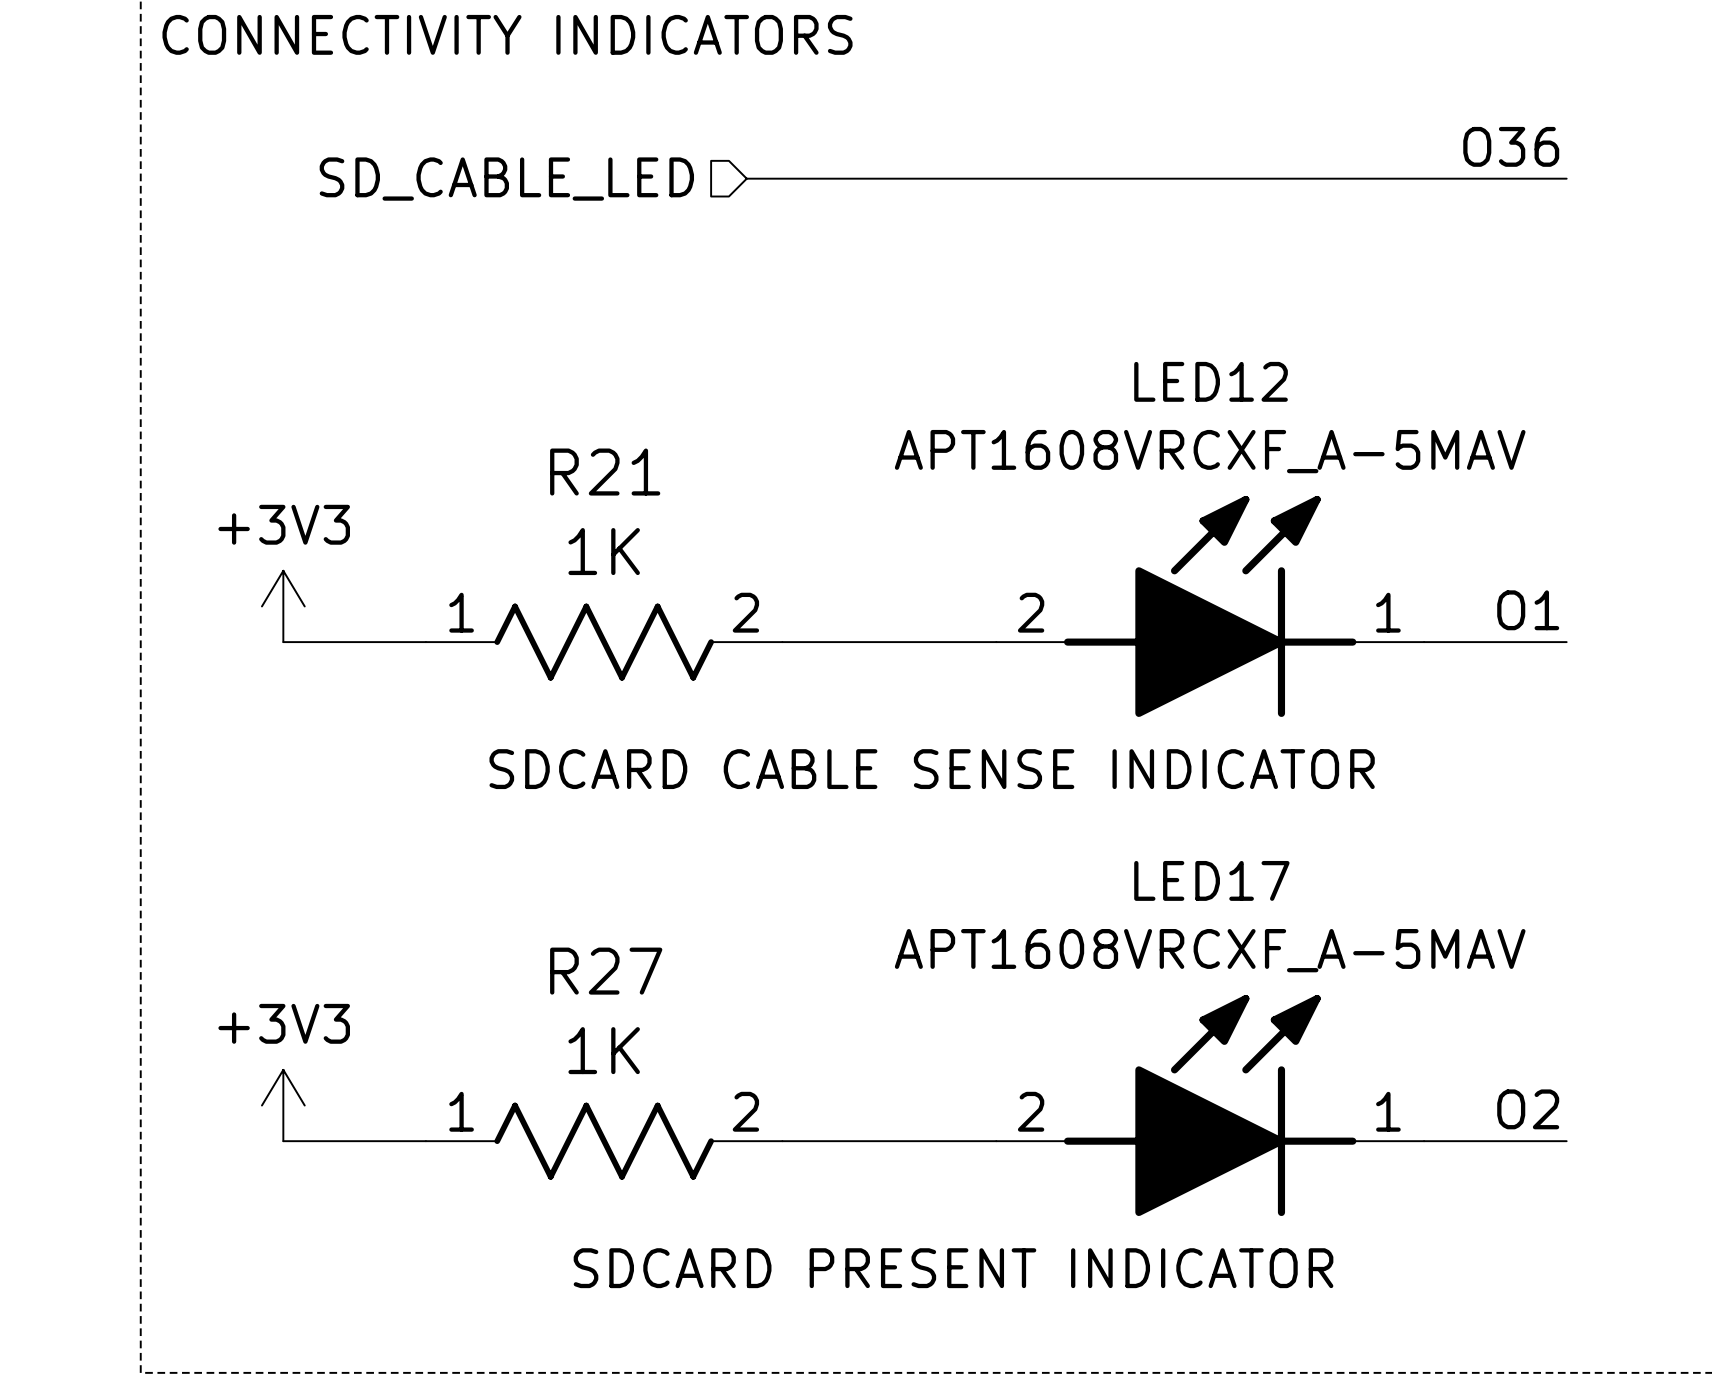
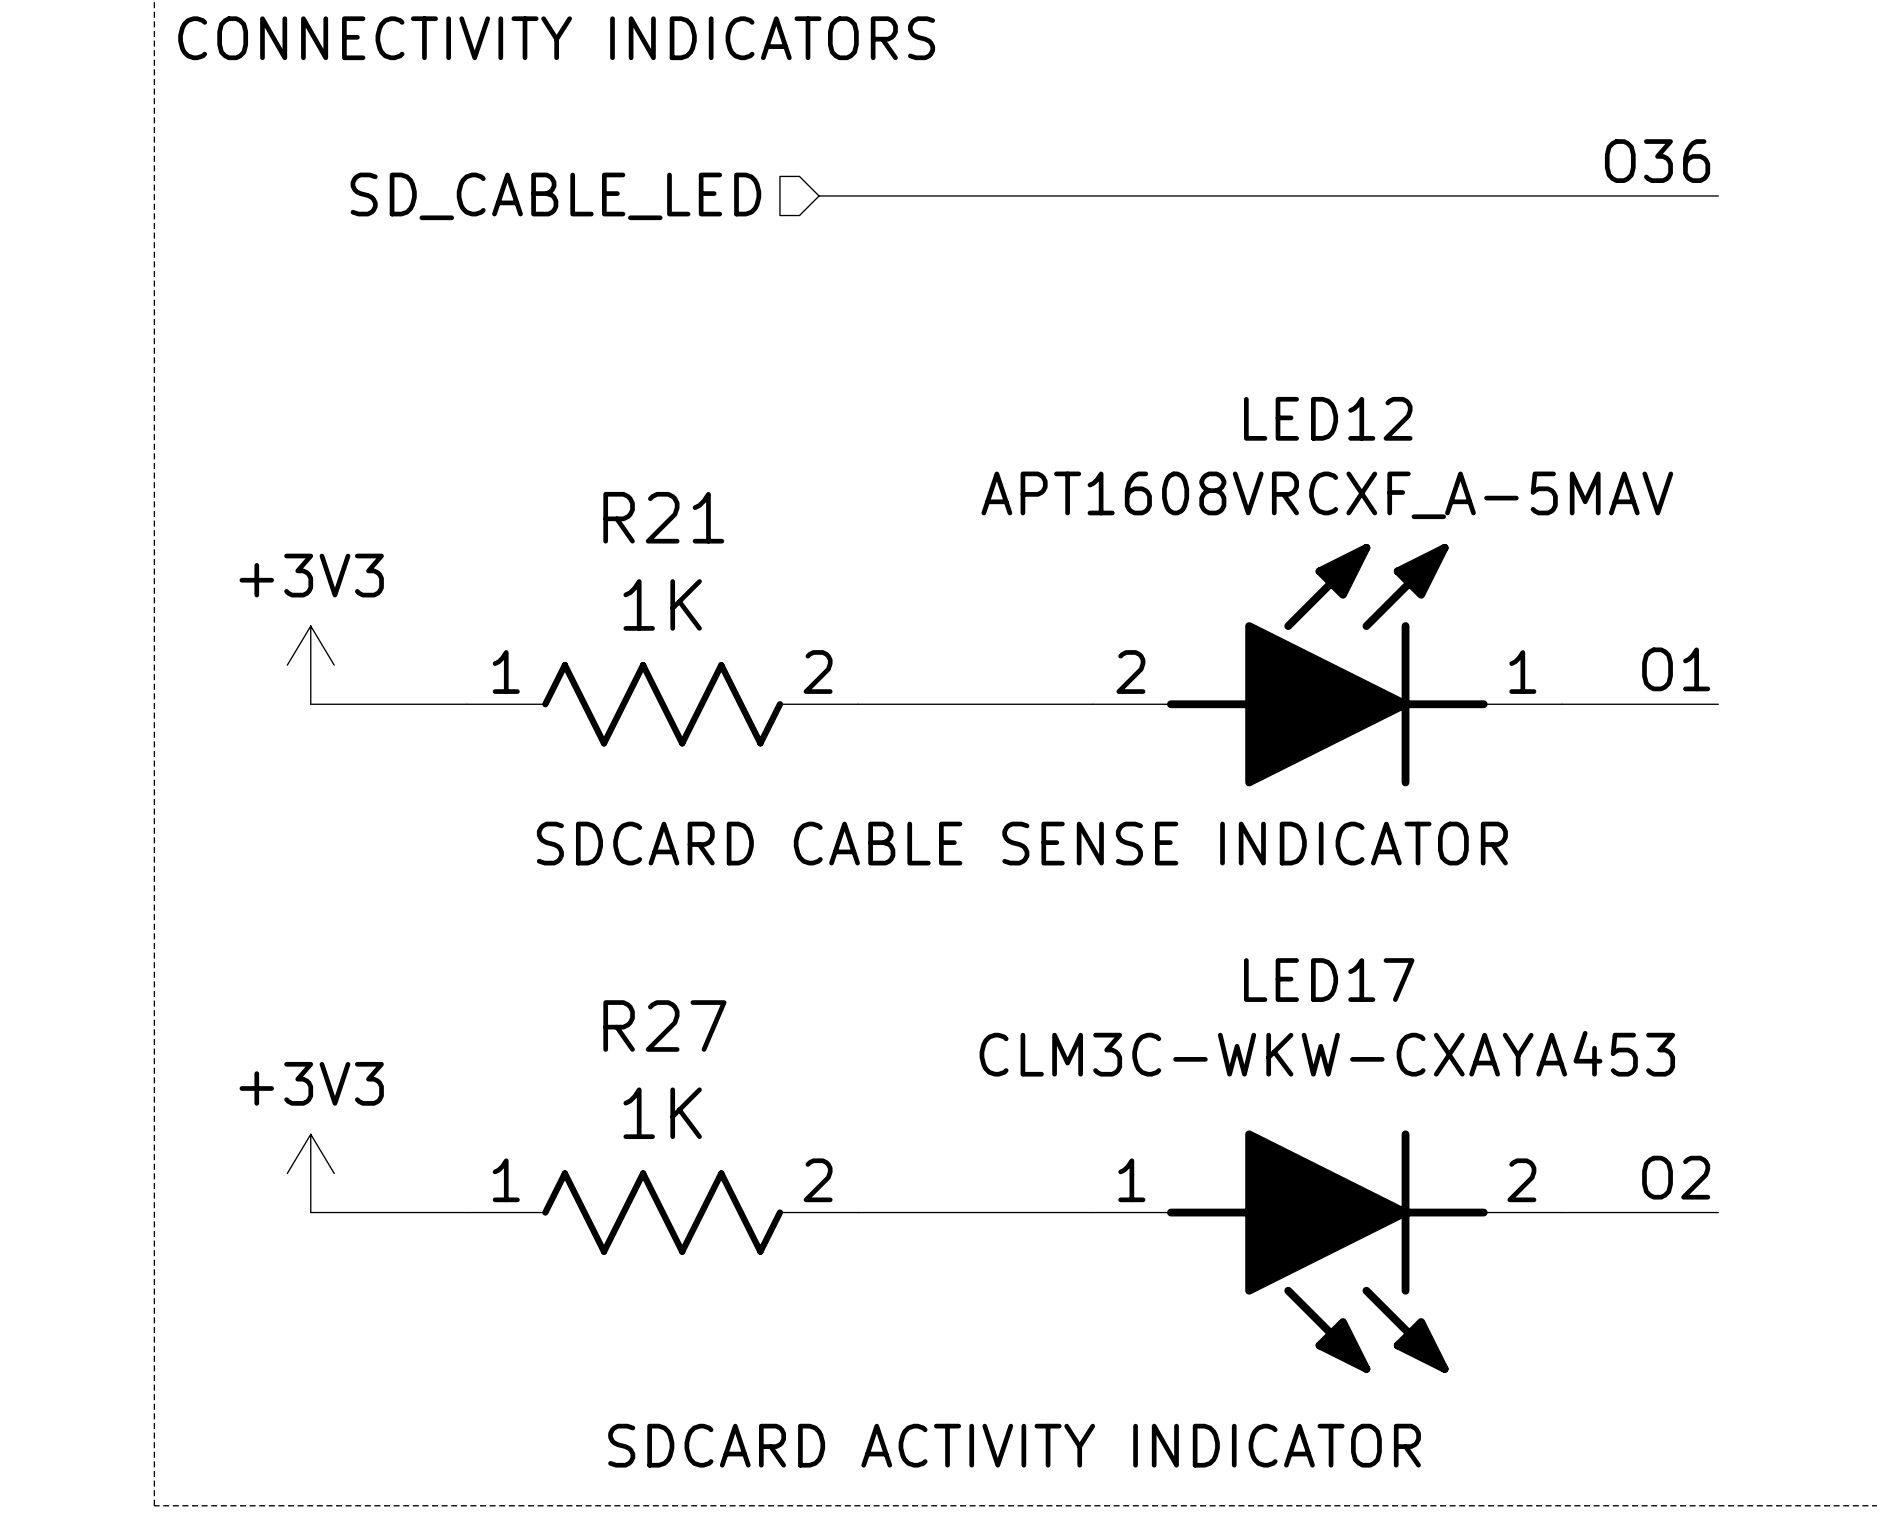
LED17 value: APT1608VRCXF_A-5MAV (1210, 950) -> CLM3C-WKW-CXAYA453 (1327, 1053)
LED17 symbol: [996, 995, 1425, 1217] -> [1092, 1130, 1562, 1373]
power symbol position: +3V3 (283, 1105) -> +3V3 (310, 1173)
label position: O2 (1528, 1109) -> O2 (1676, 1177)
wire: (283, 1141) (425, 1141) -> (310, 1212) (467, 1212)
R27 position: (604, 1141) -> (662, 1212)
wire: (782, 1141) (996, 1141) -> (858, 1212) (1092, 1212)
wire: (1424, 1141) (1566, 1141) -> (1561, 1212) (1718, 1212)
LED17 text: SDCARD PRESENT INDICATOR (953, 1268) -> none
LED17 text: none -> SDCARD ACTIVITY INDICATOR (1014, 1445)

